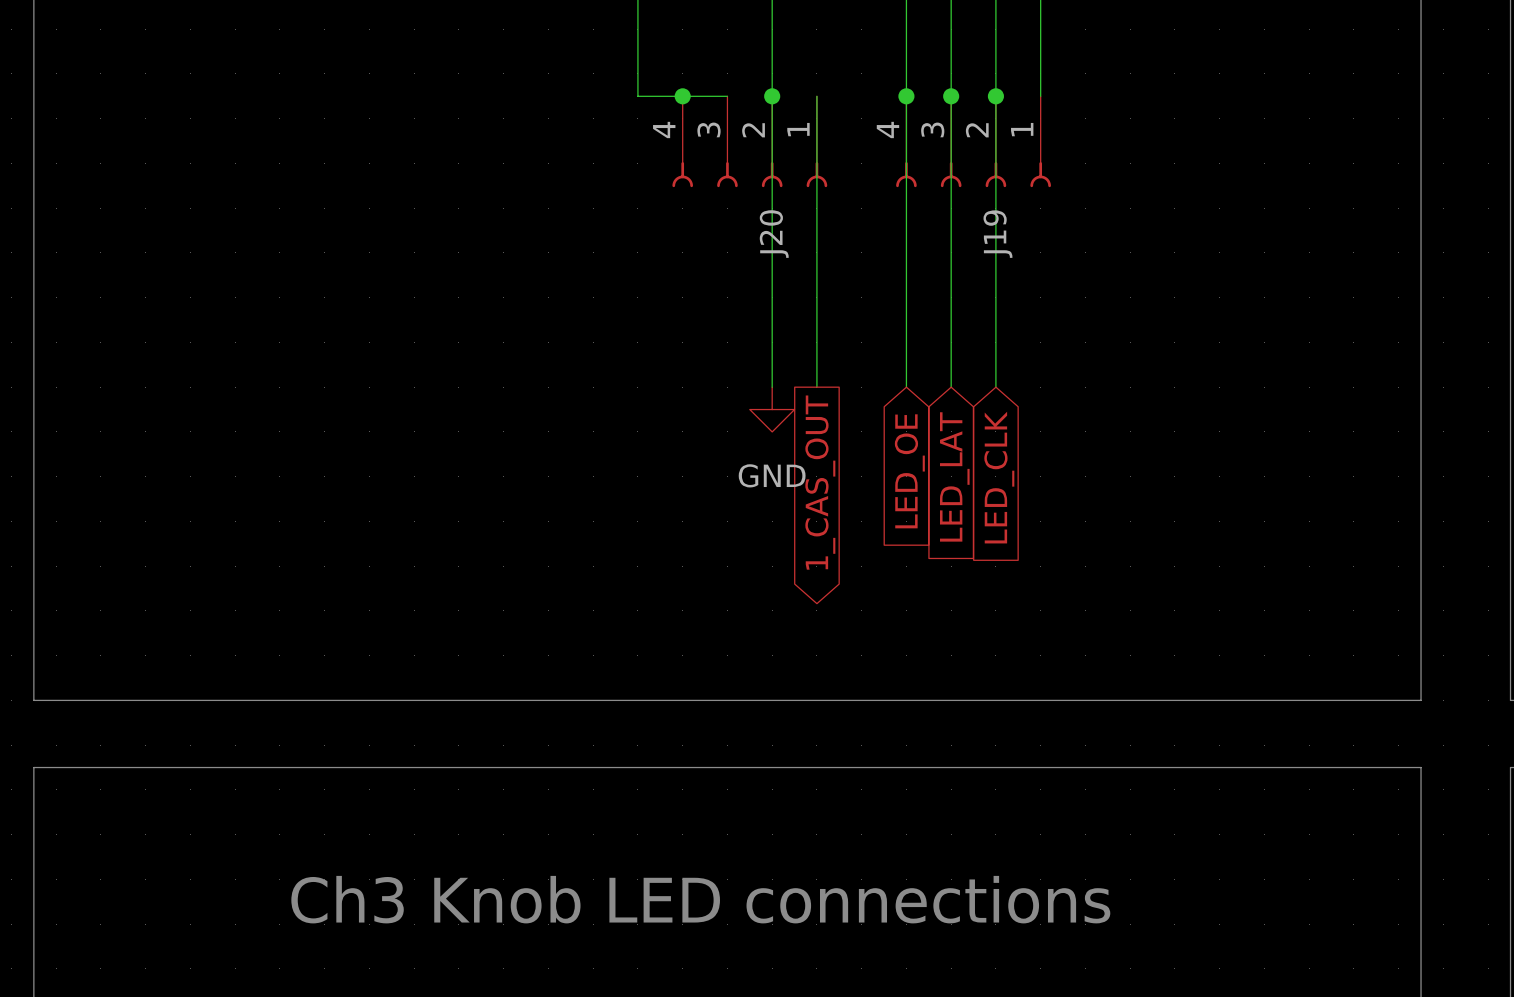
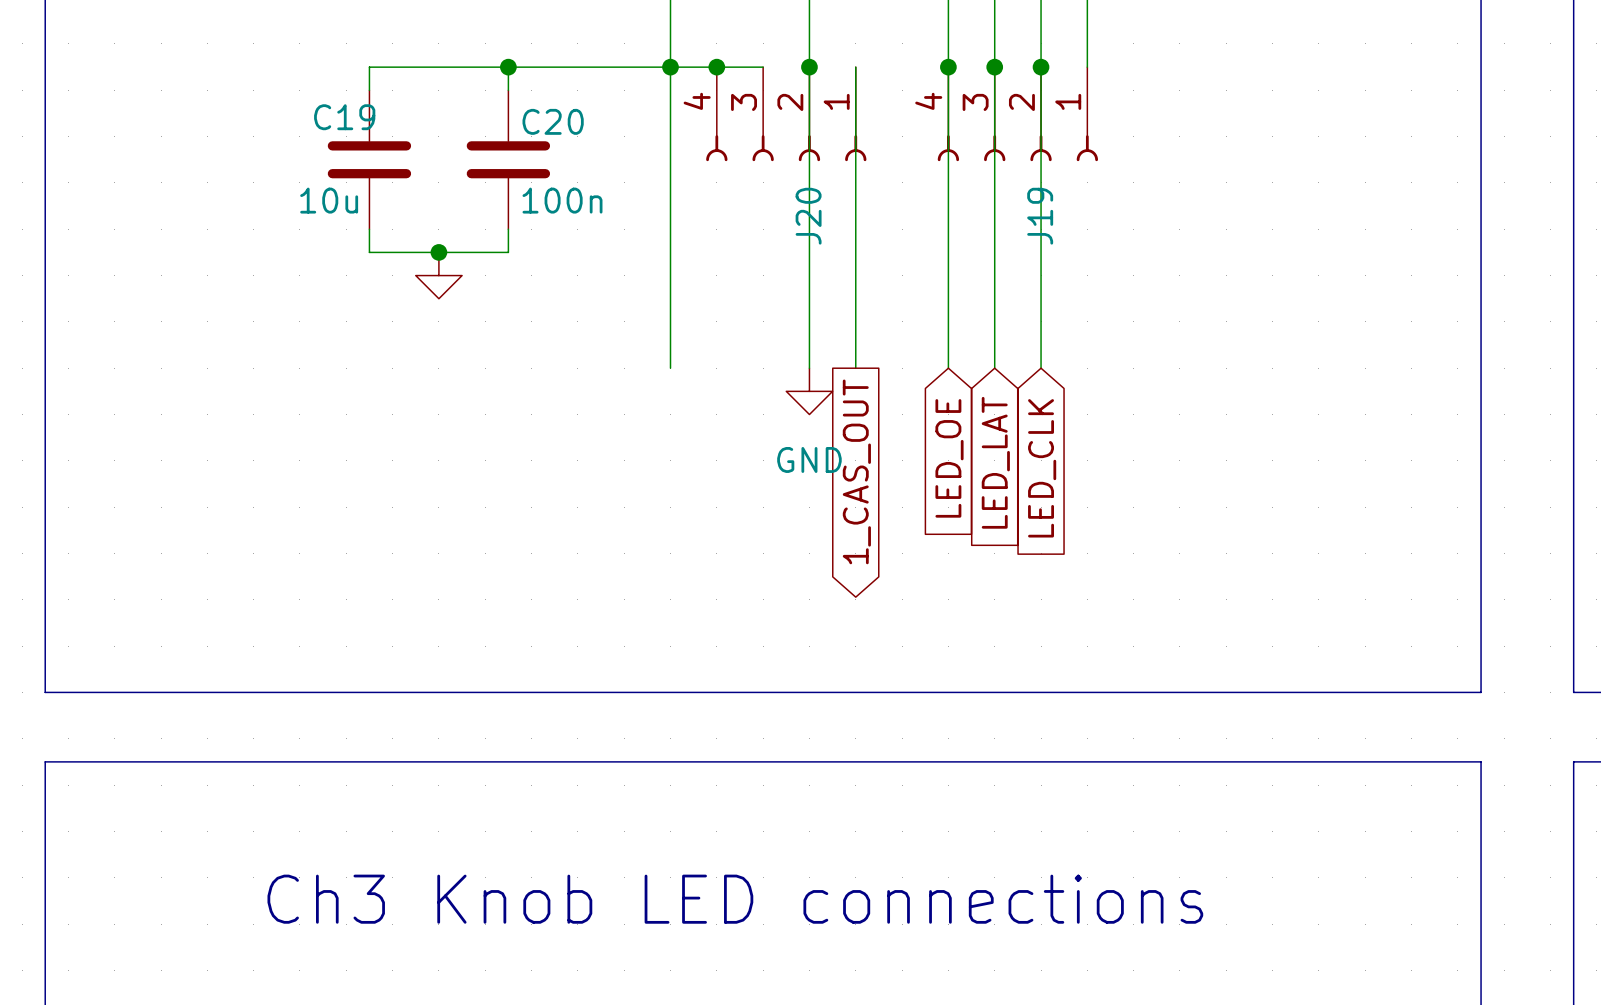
wire: none -> (508, 67) (508, 90)
junction: none -> (508, 67)
junction: none -> (670, 67)
wire: none -> (369, 90) (369, 67) (670, 67) (670, 368)
C19: none -> 10u (369, 159)
C20: none -> 100n (508, 159)
wire: none -> (369, 229) (369, 252) (508, 252) (508, 229)
junction: none -> (438, 252)
power symbol: none -> (438, 275)

